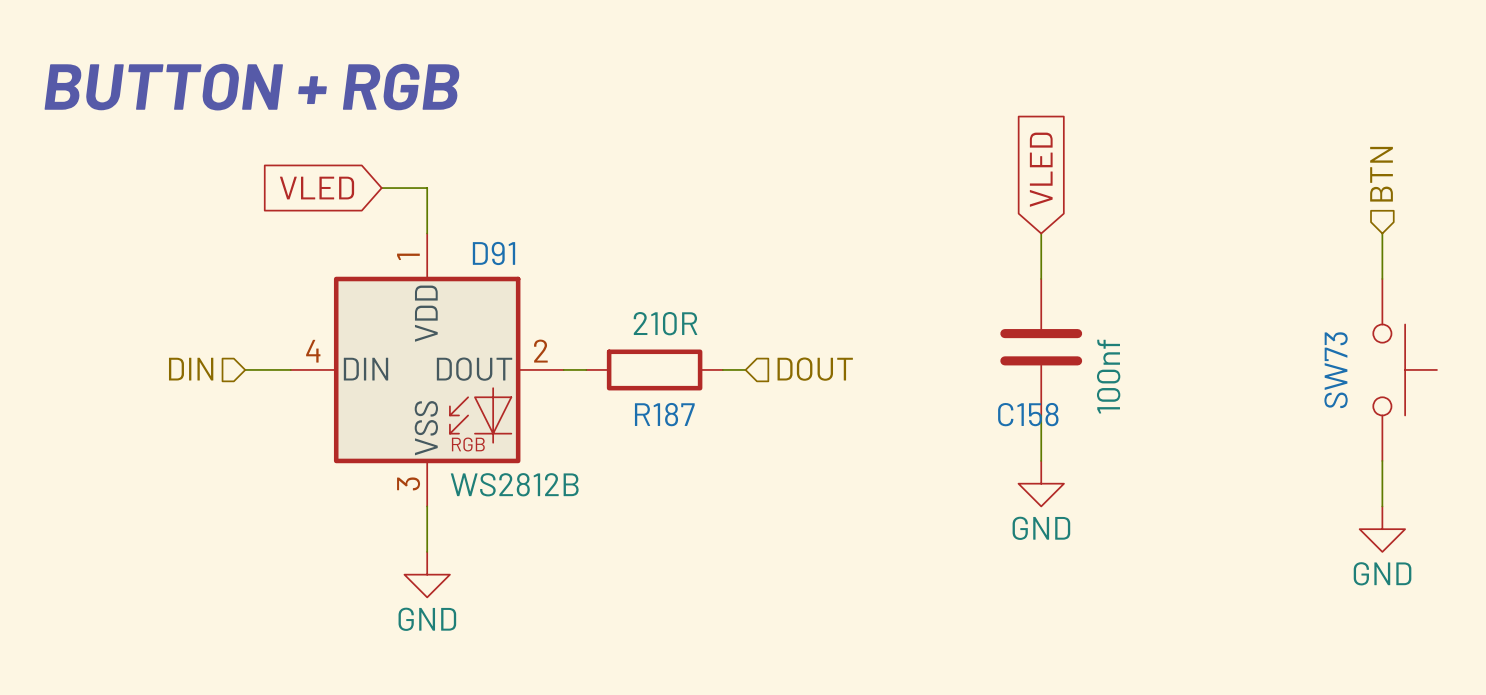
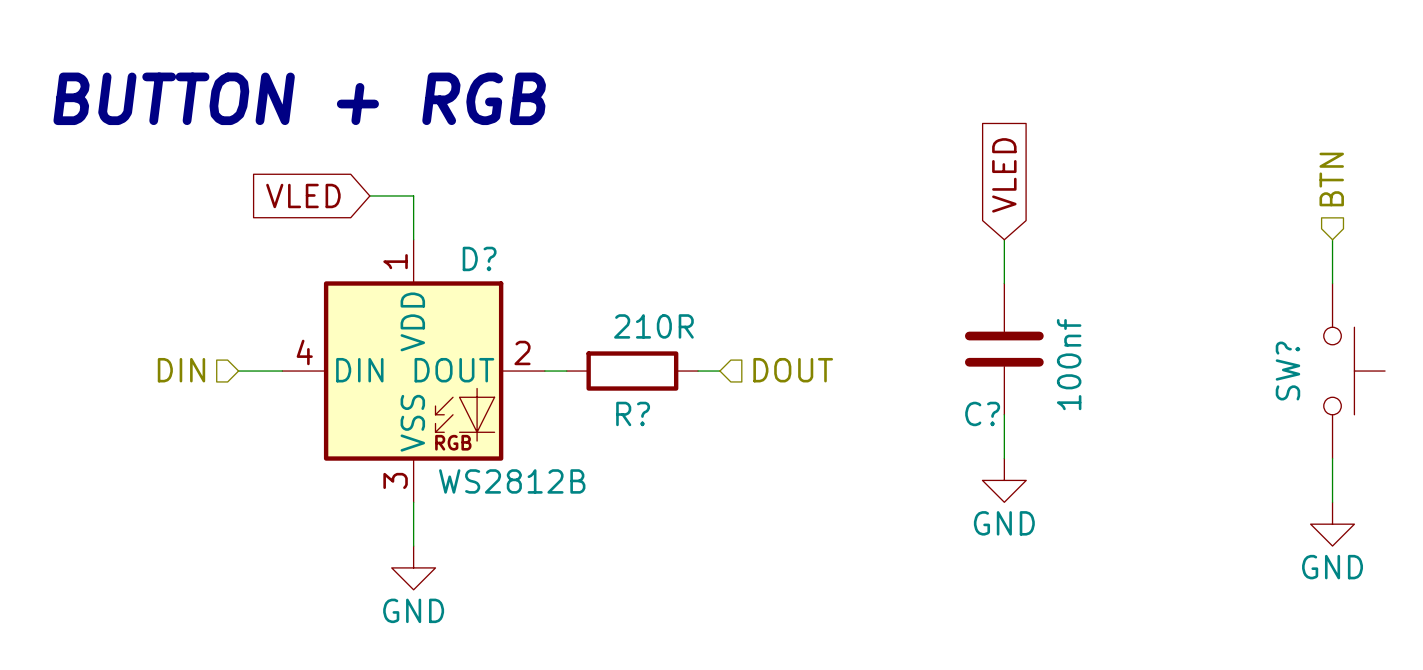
D91 name: D91 (493, 253) -> D? (479, 258)
SW73 name: SW73 (1336, 370) -> SW? (1287, 371)
R187 name: R187 (664, 414) -> R? (633, 413)
C158 name: C158 (1028, 414) -> C? (982, 413)

